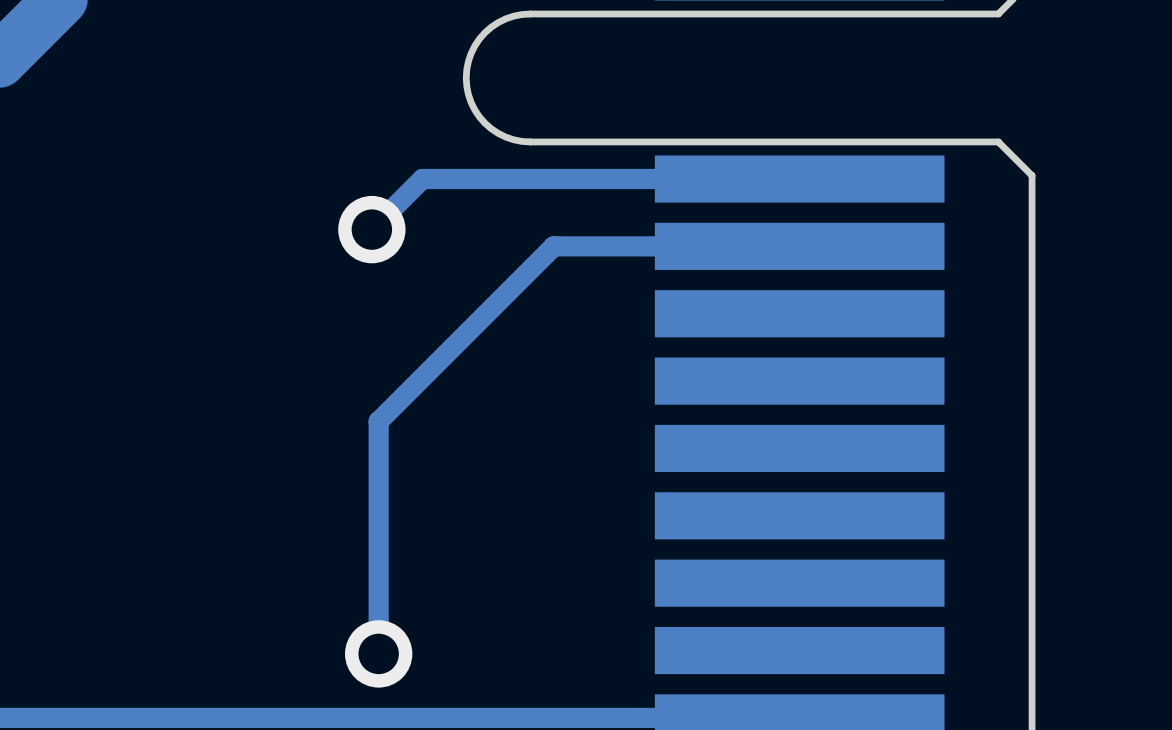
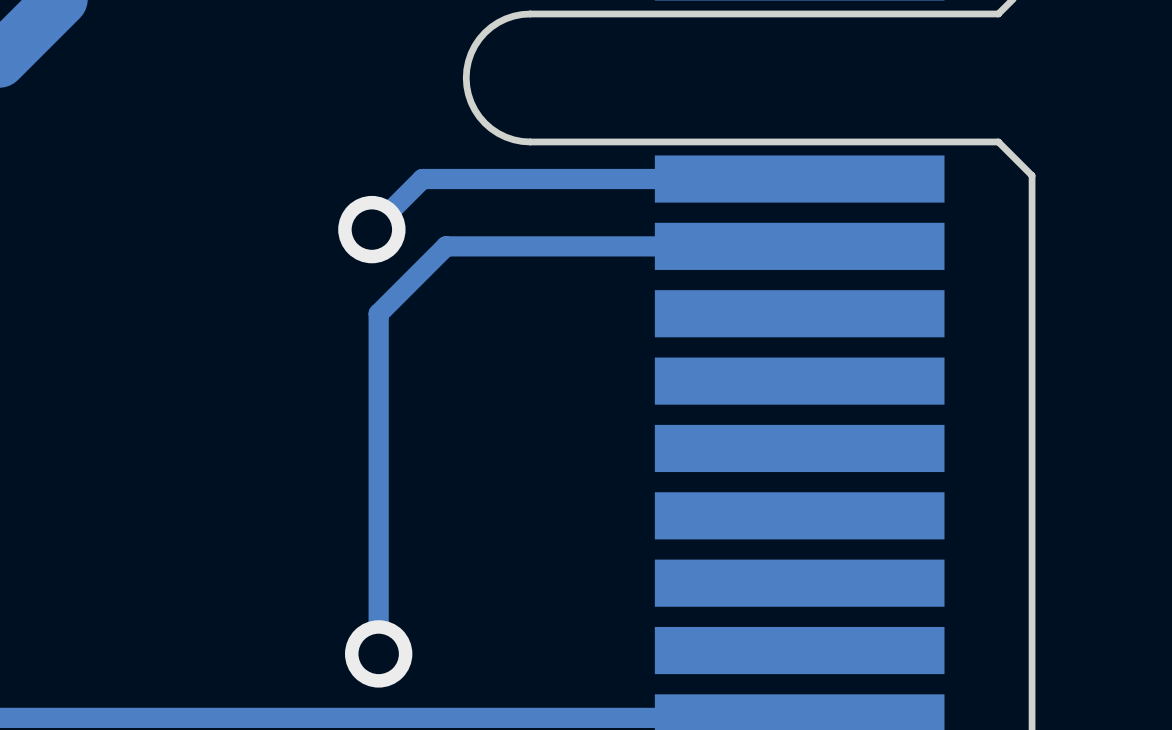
track: (553, 246) (378, 421) -> (553, 246) (446, 246) (378, 313) (378, 421)

